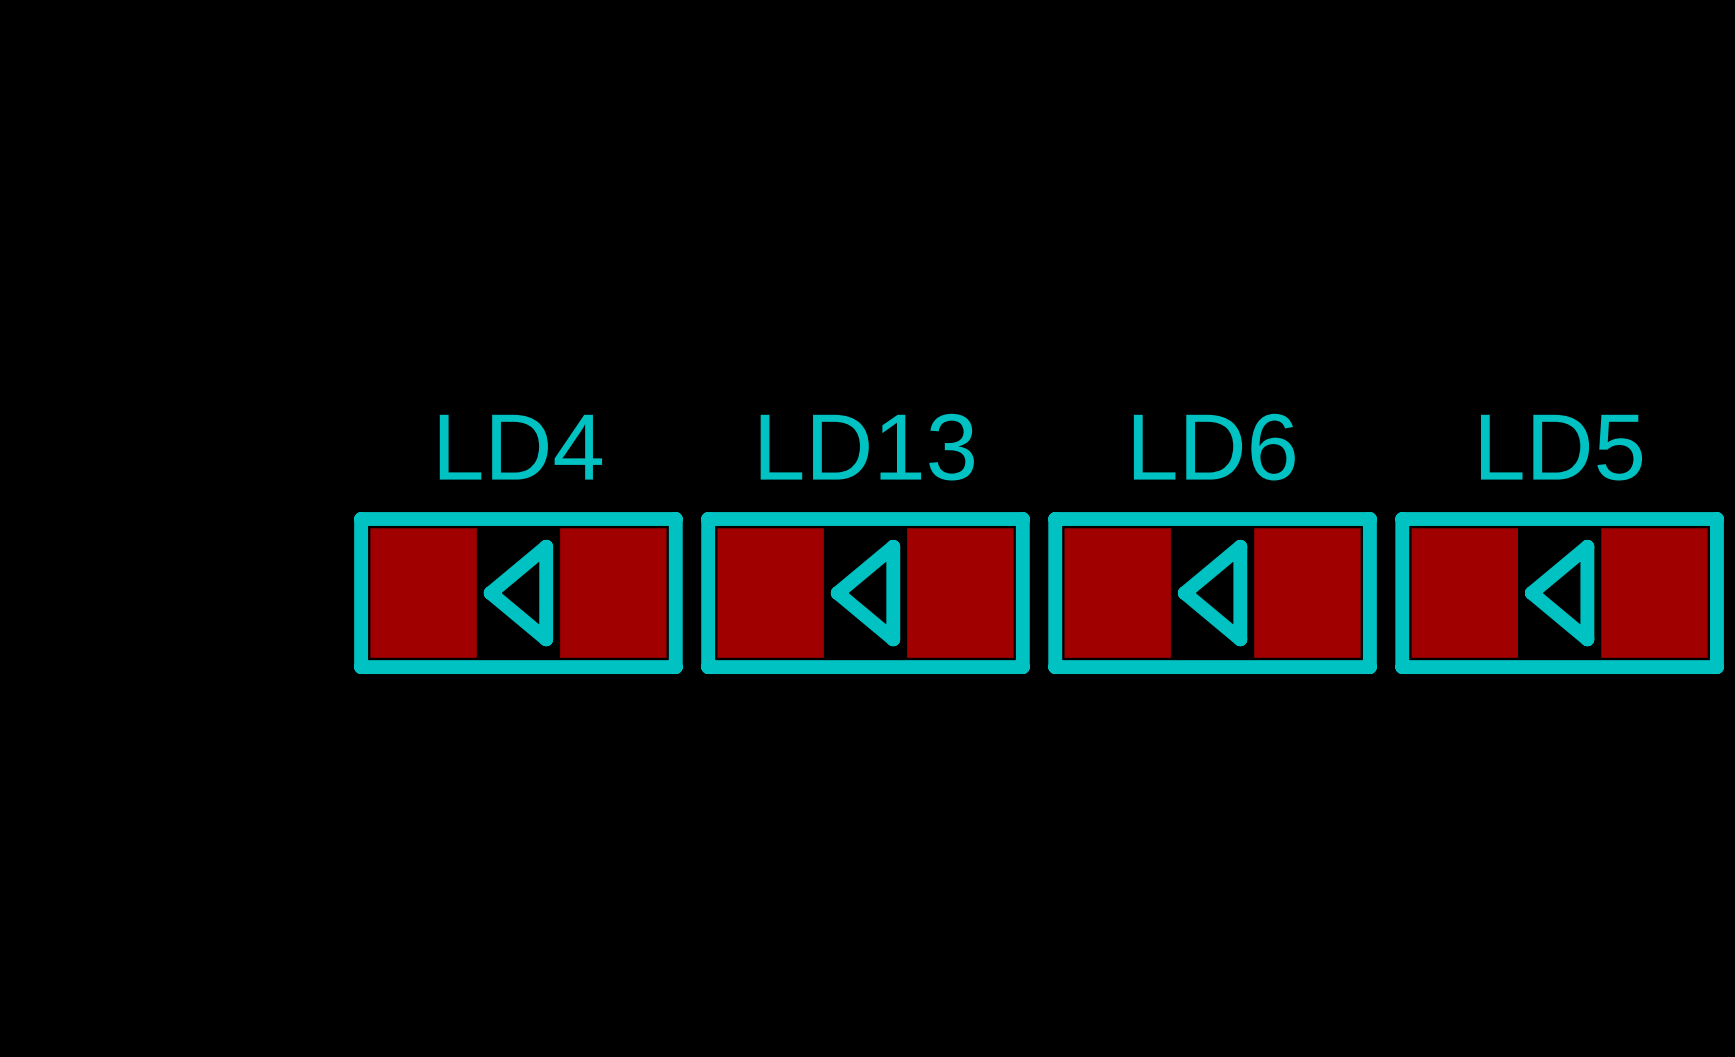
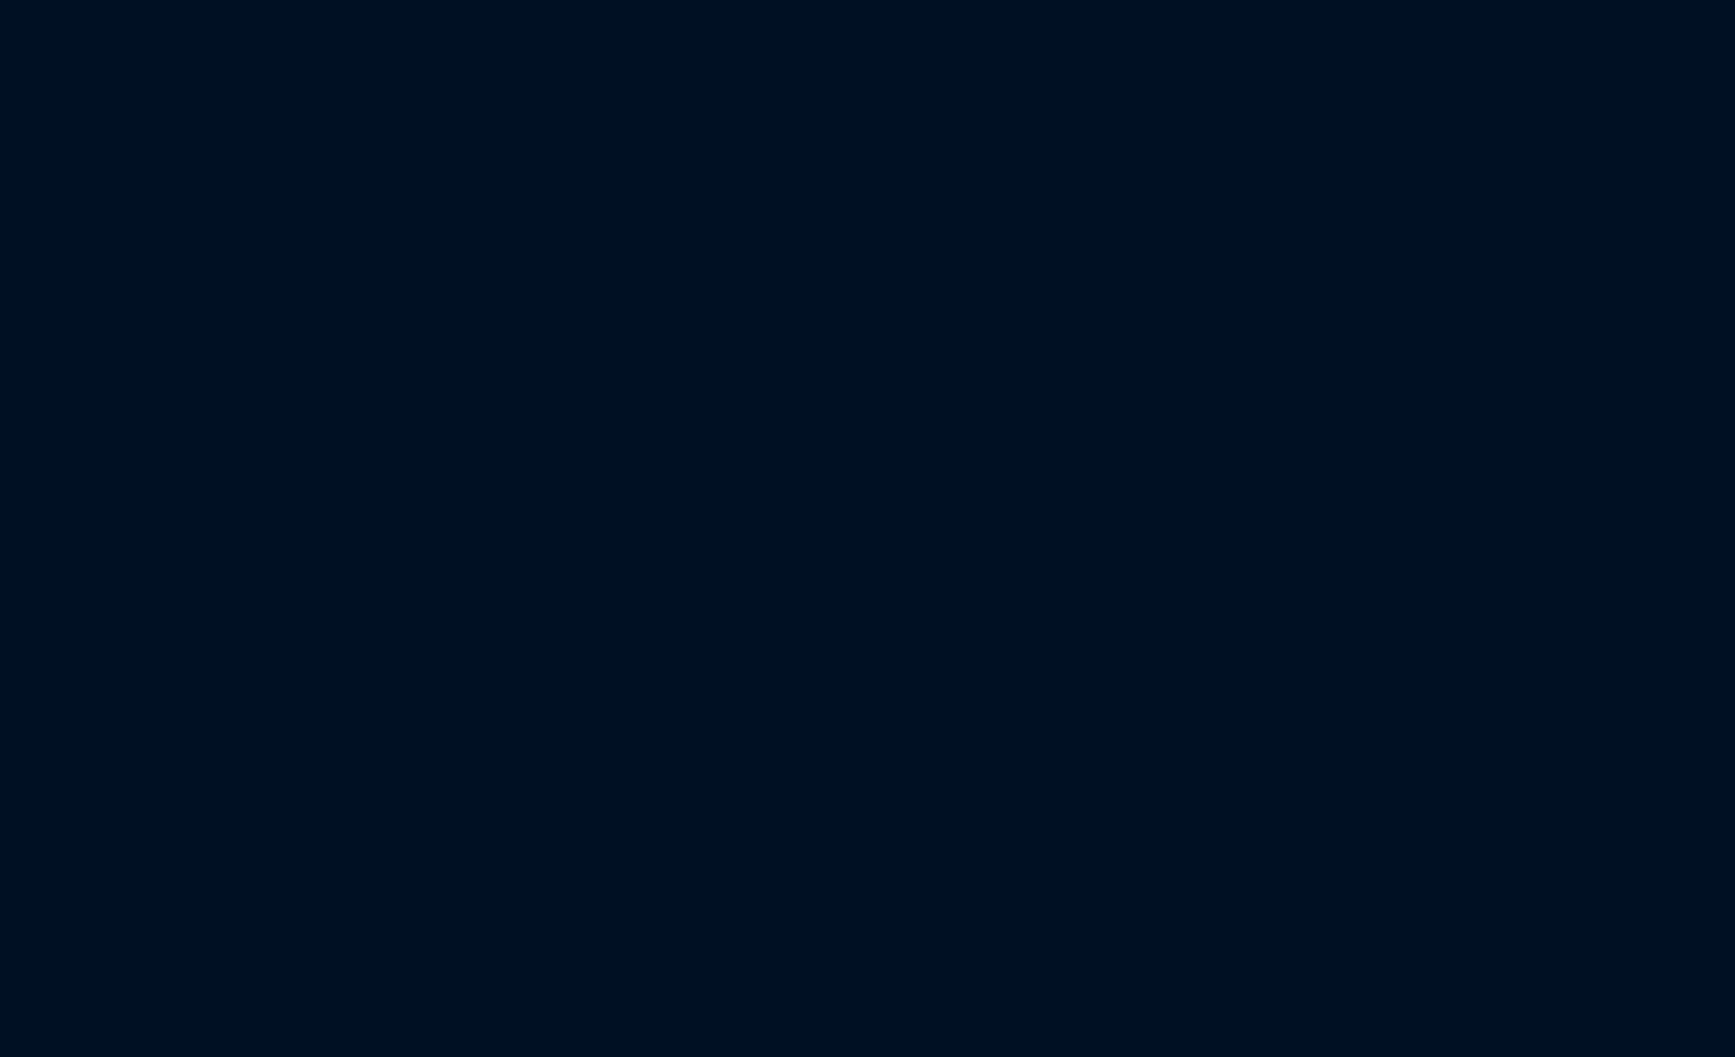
LD4: (518, 593) -> none
LD13: (865, 593) -> none
LD6: (1212, 593) -> none
LD5: (1559, 593) -> none

